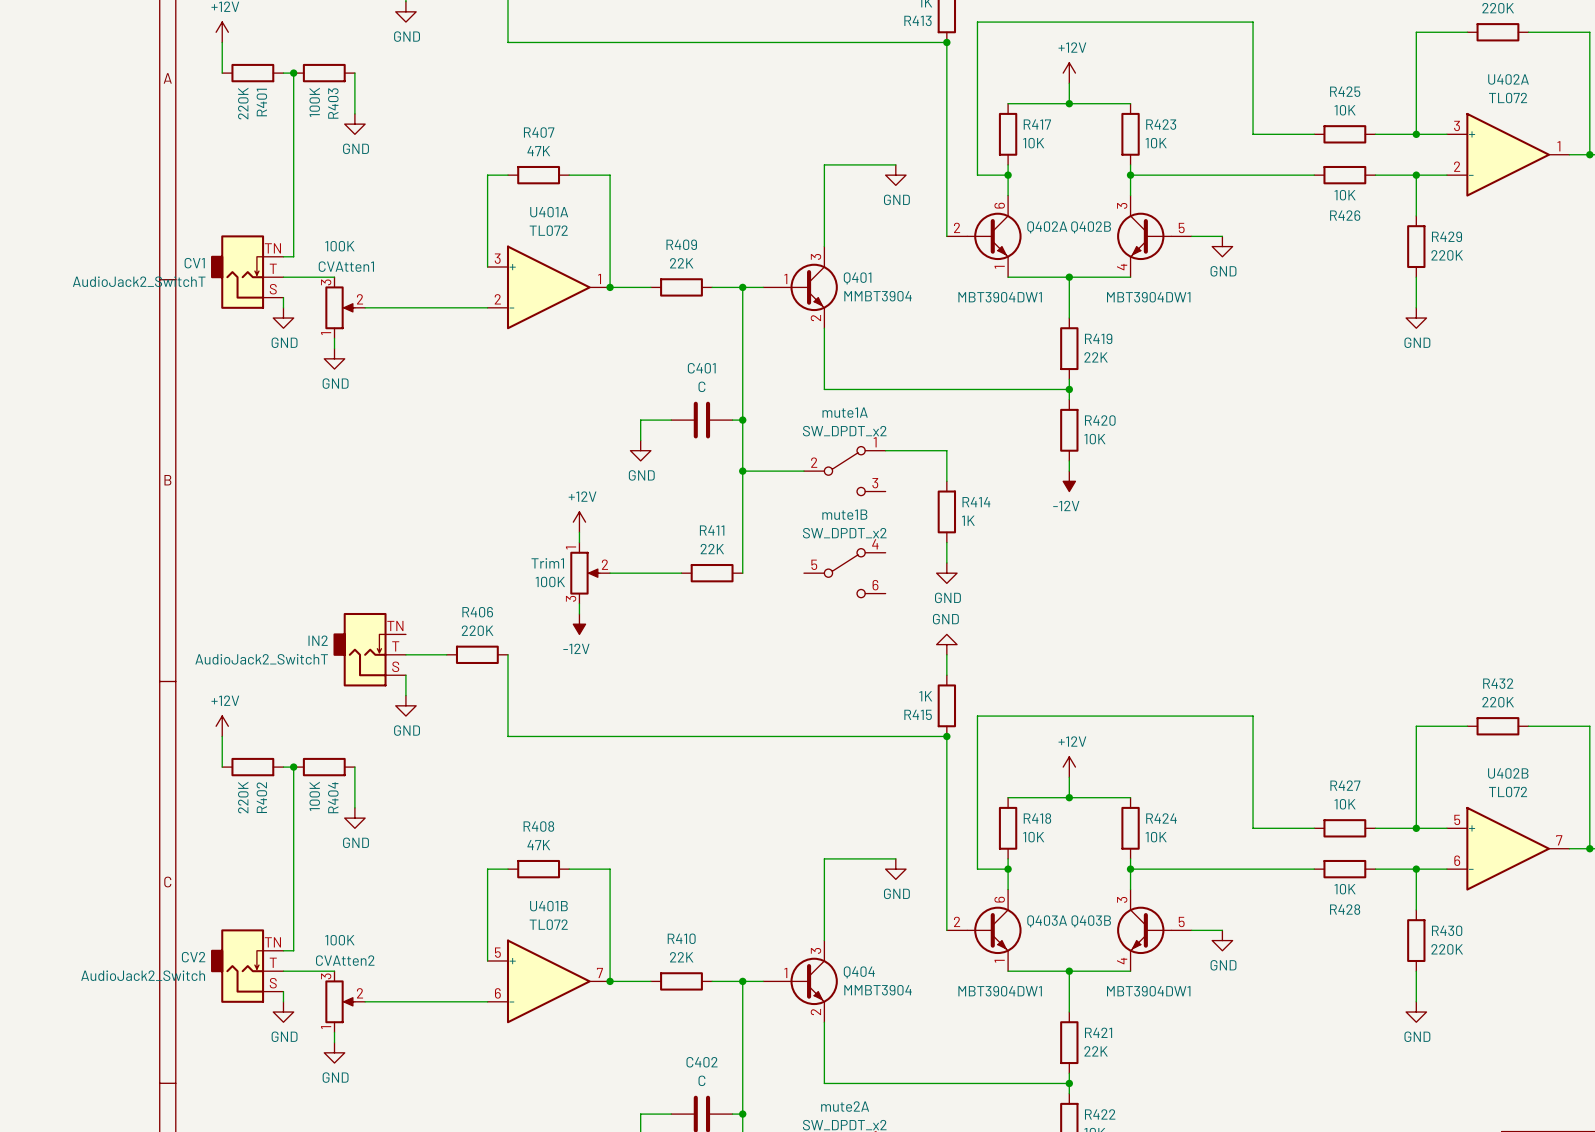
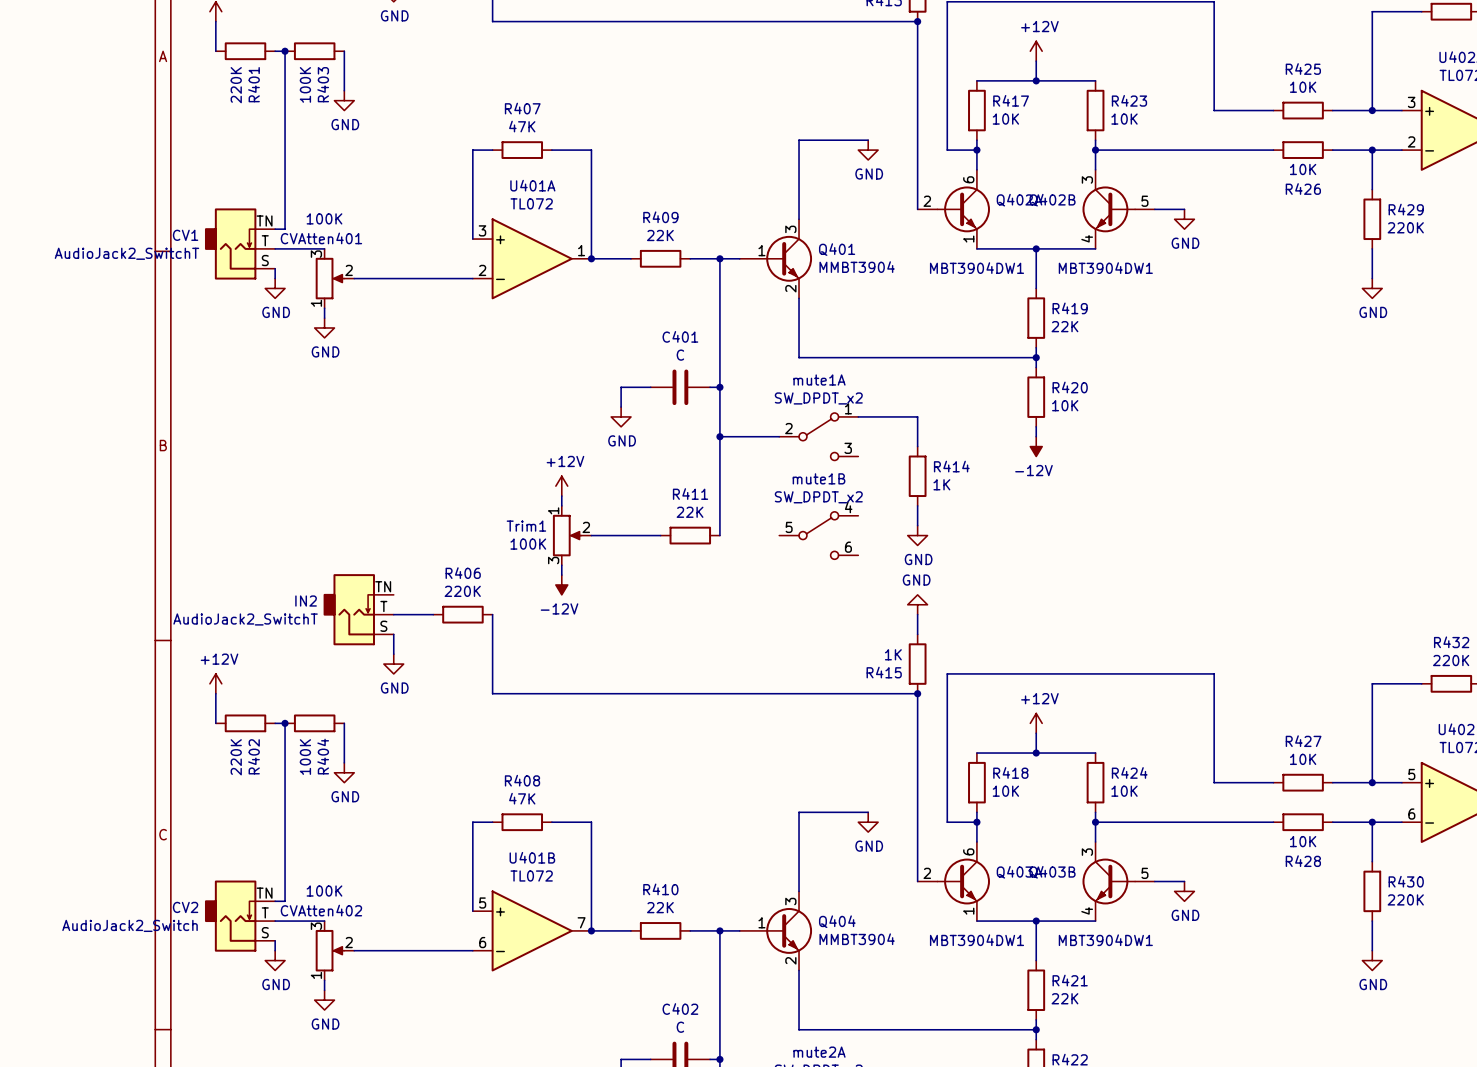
CVAtten1 name: CVAtten1 (346, 266) -> CVAtten401 (321, 238)
CVAtten2 name: CVAtten2 (345, 960) -> CVAtten402 (321, 910)

